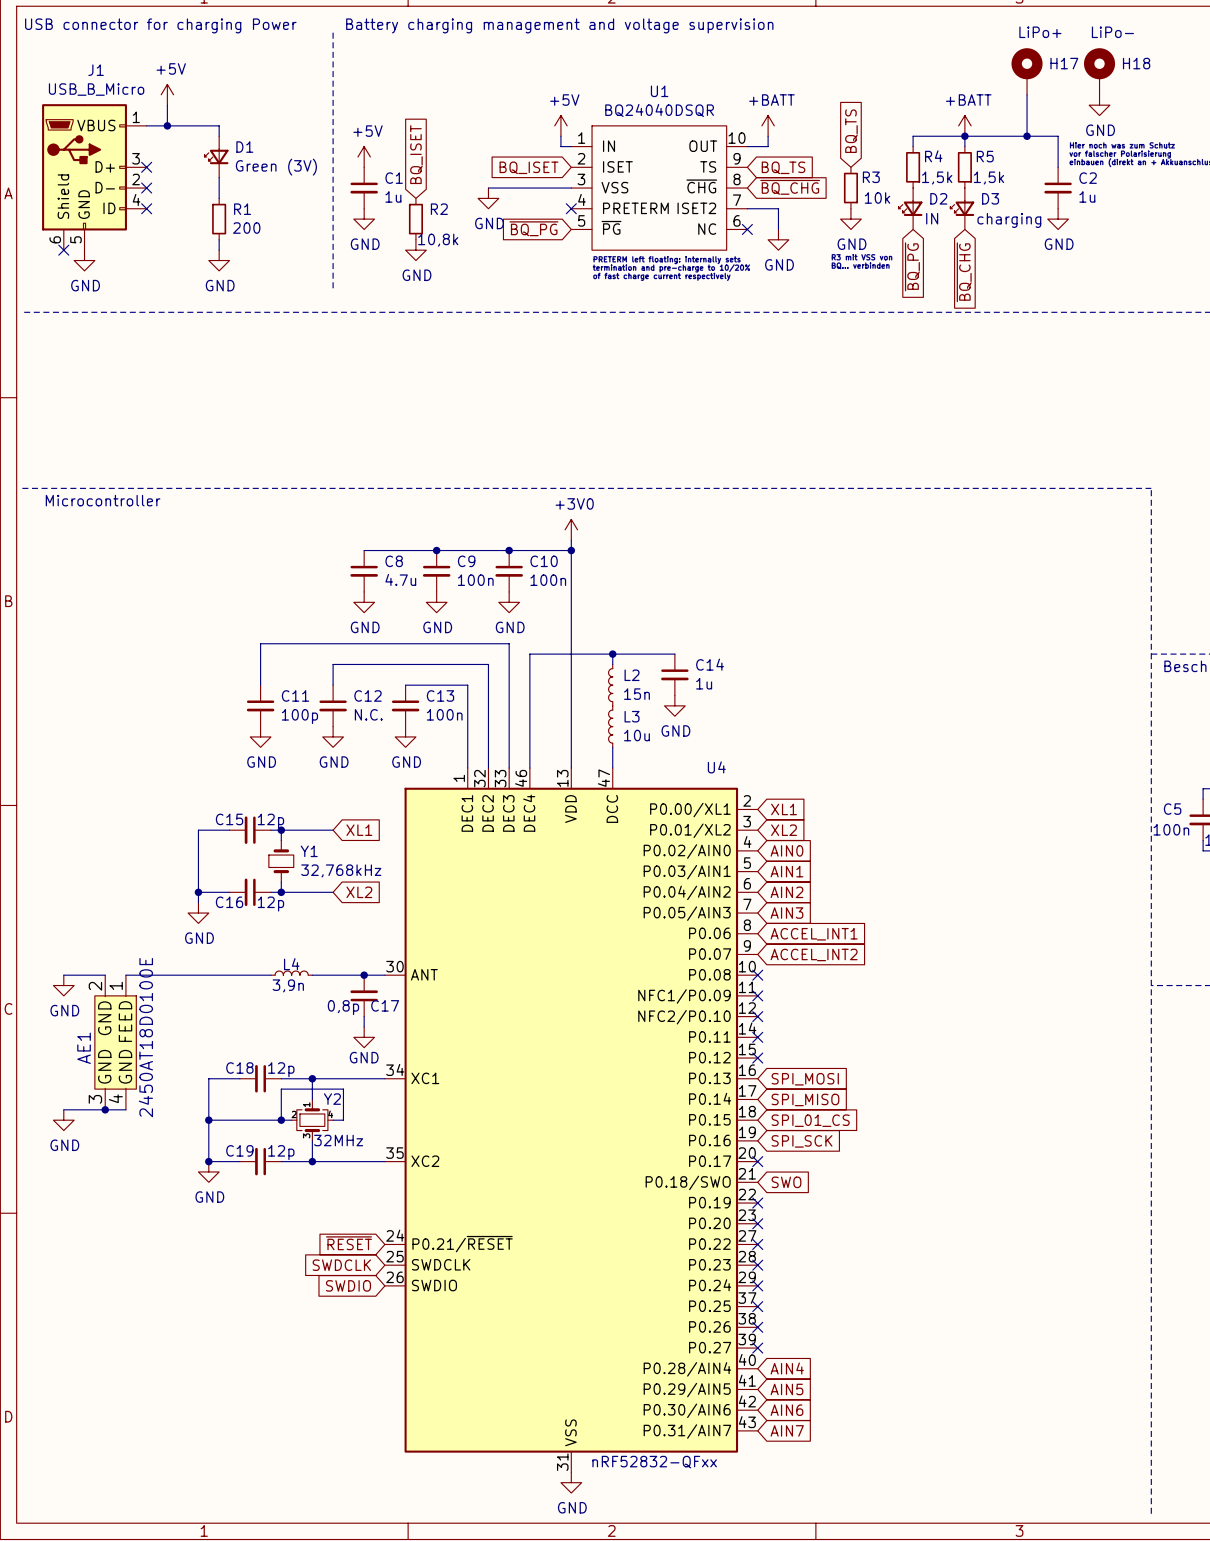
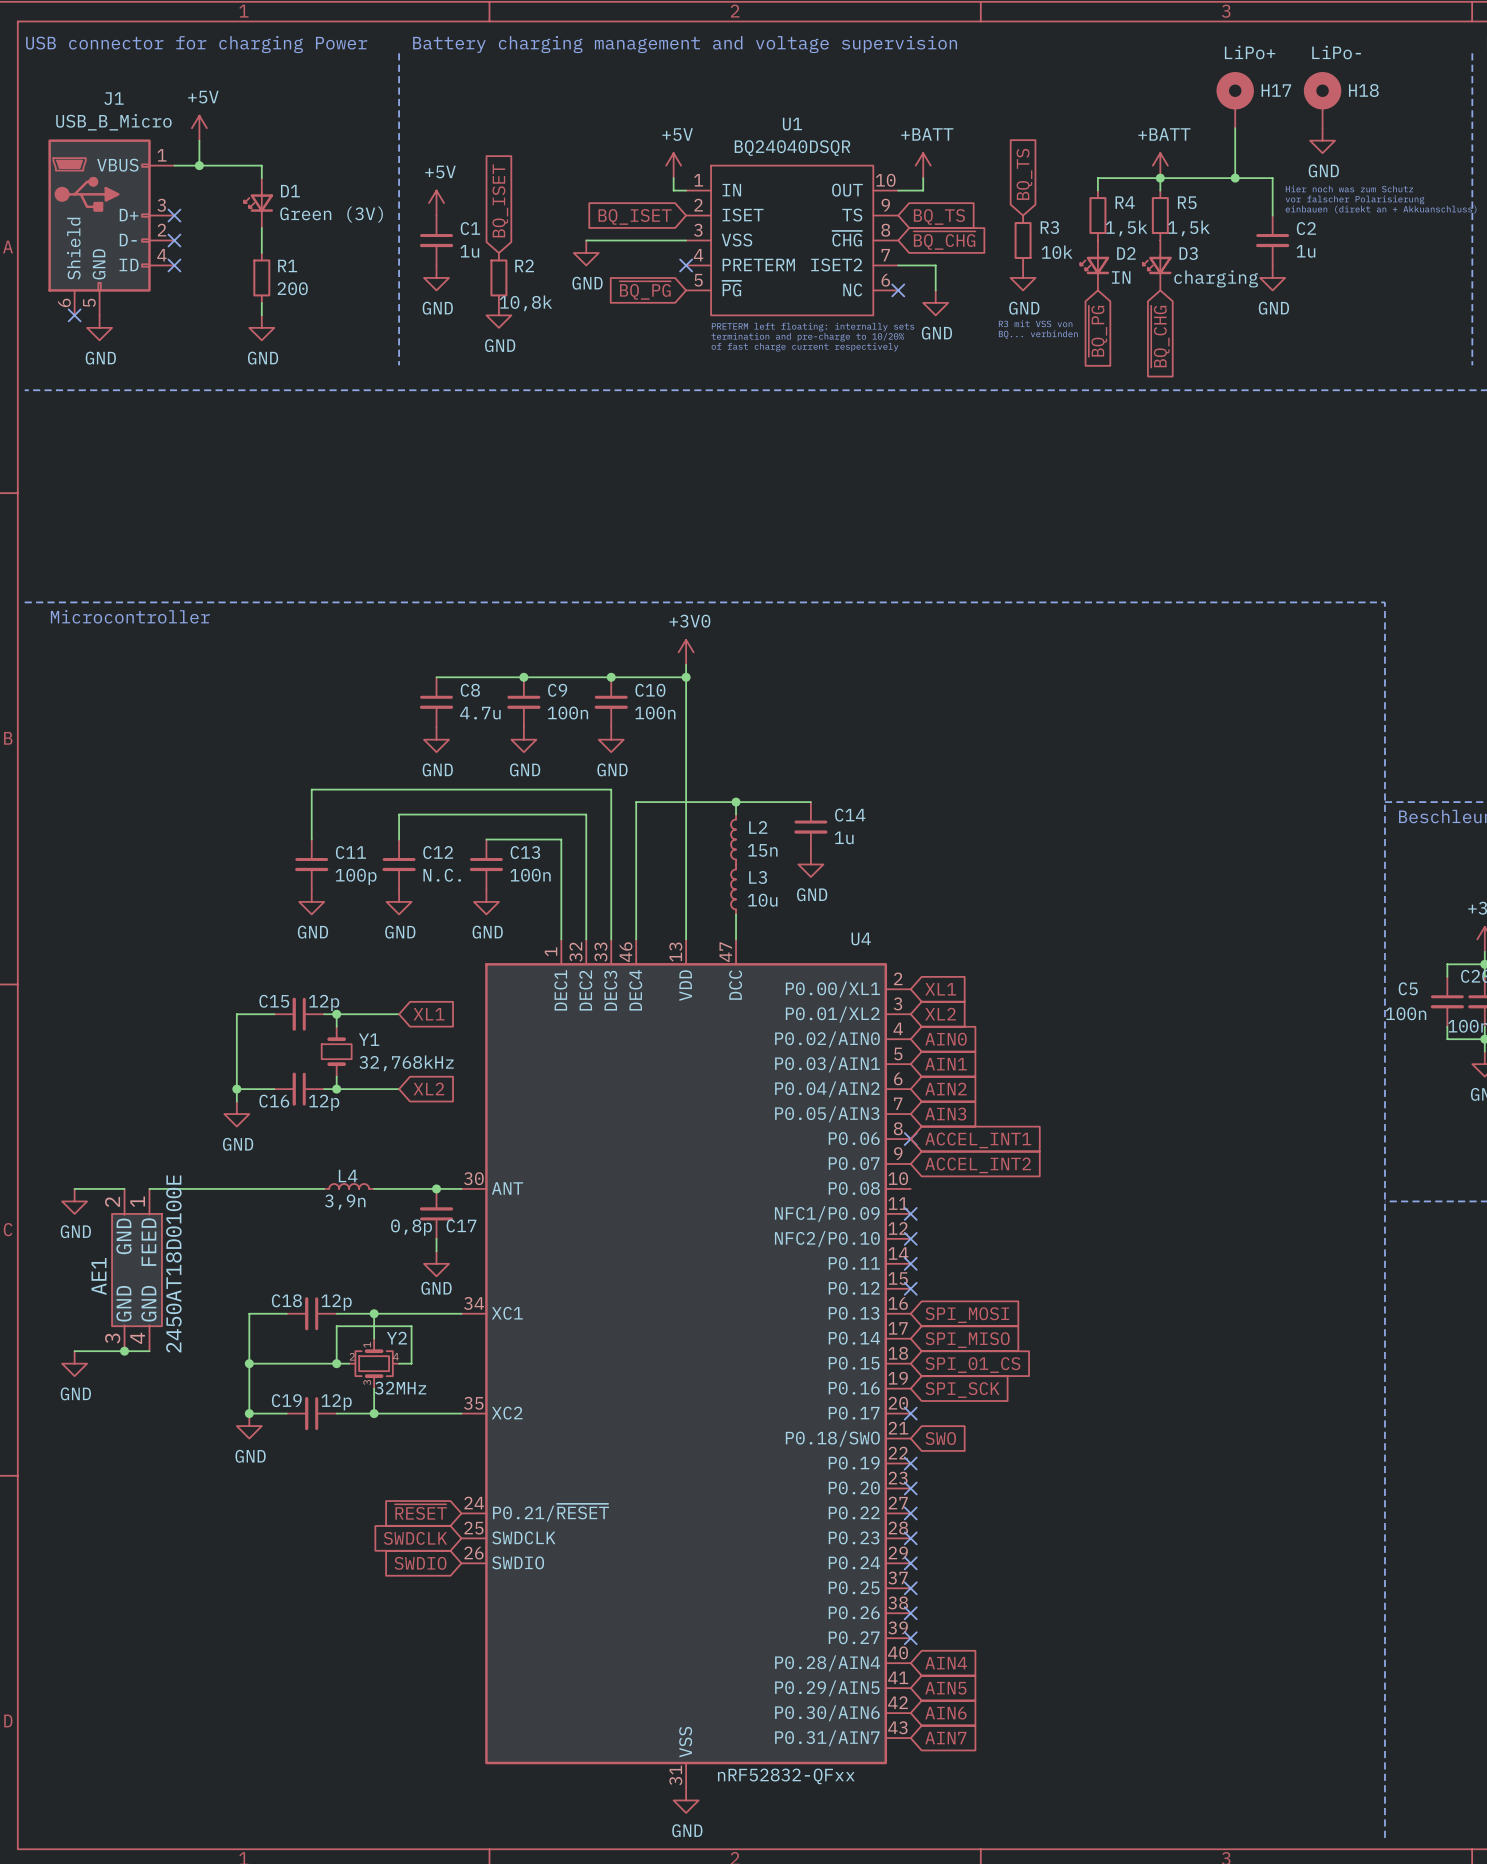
no-connect mark position: (757, 975) -> (910, 1139)

